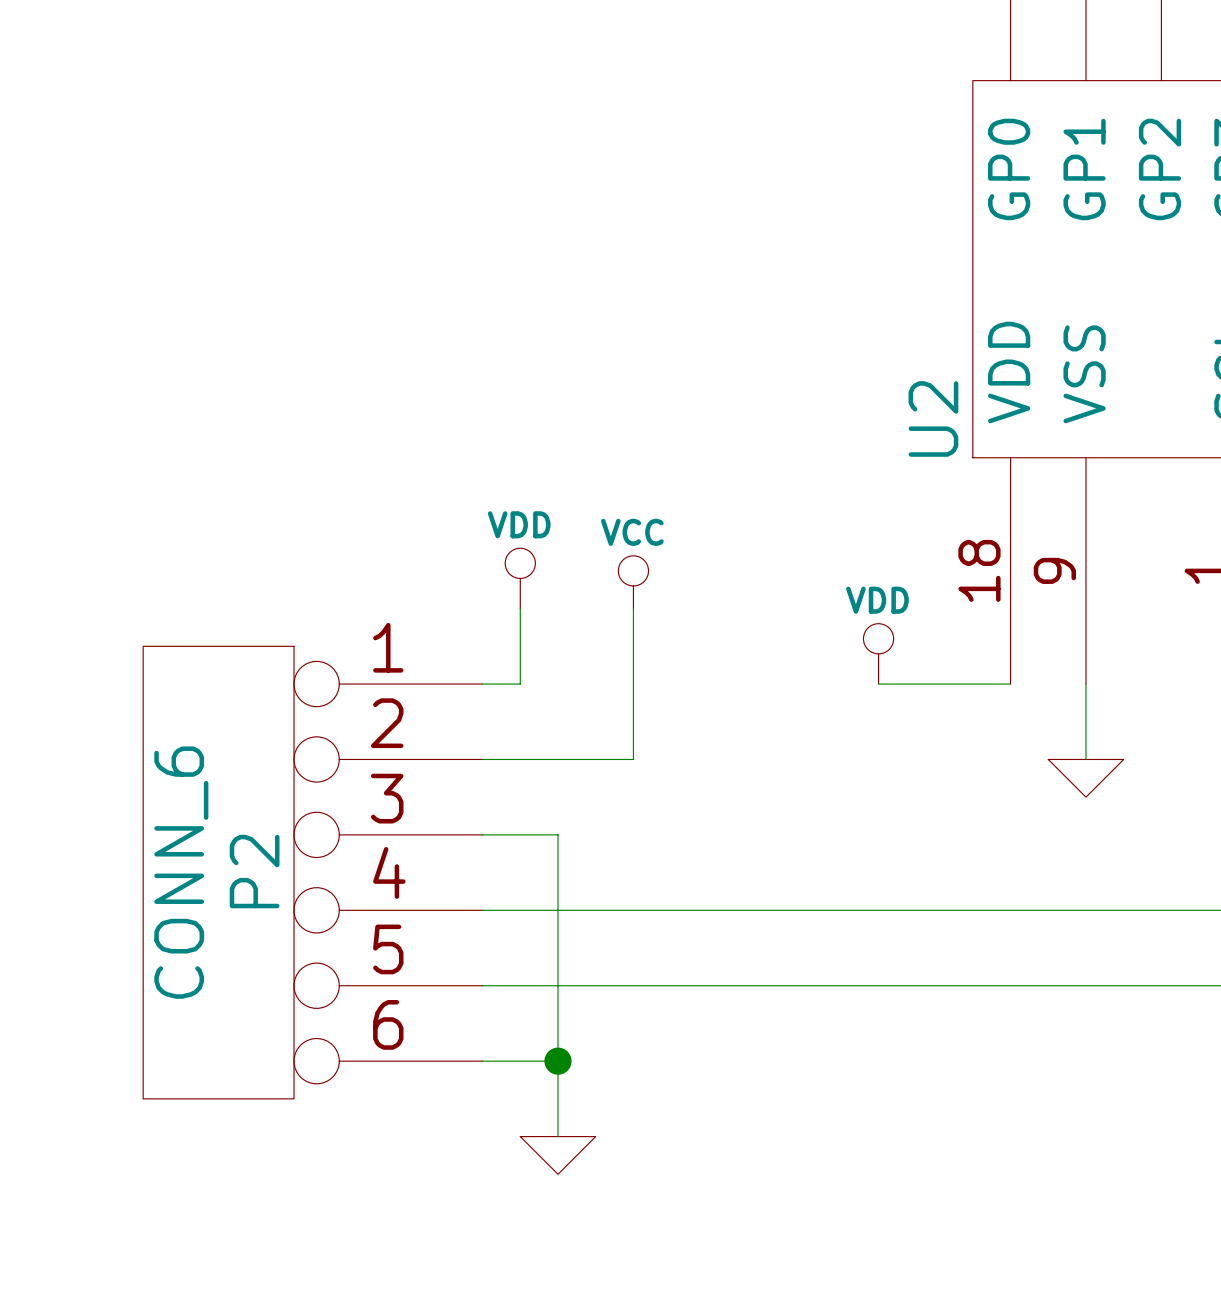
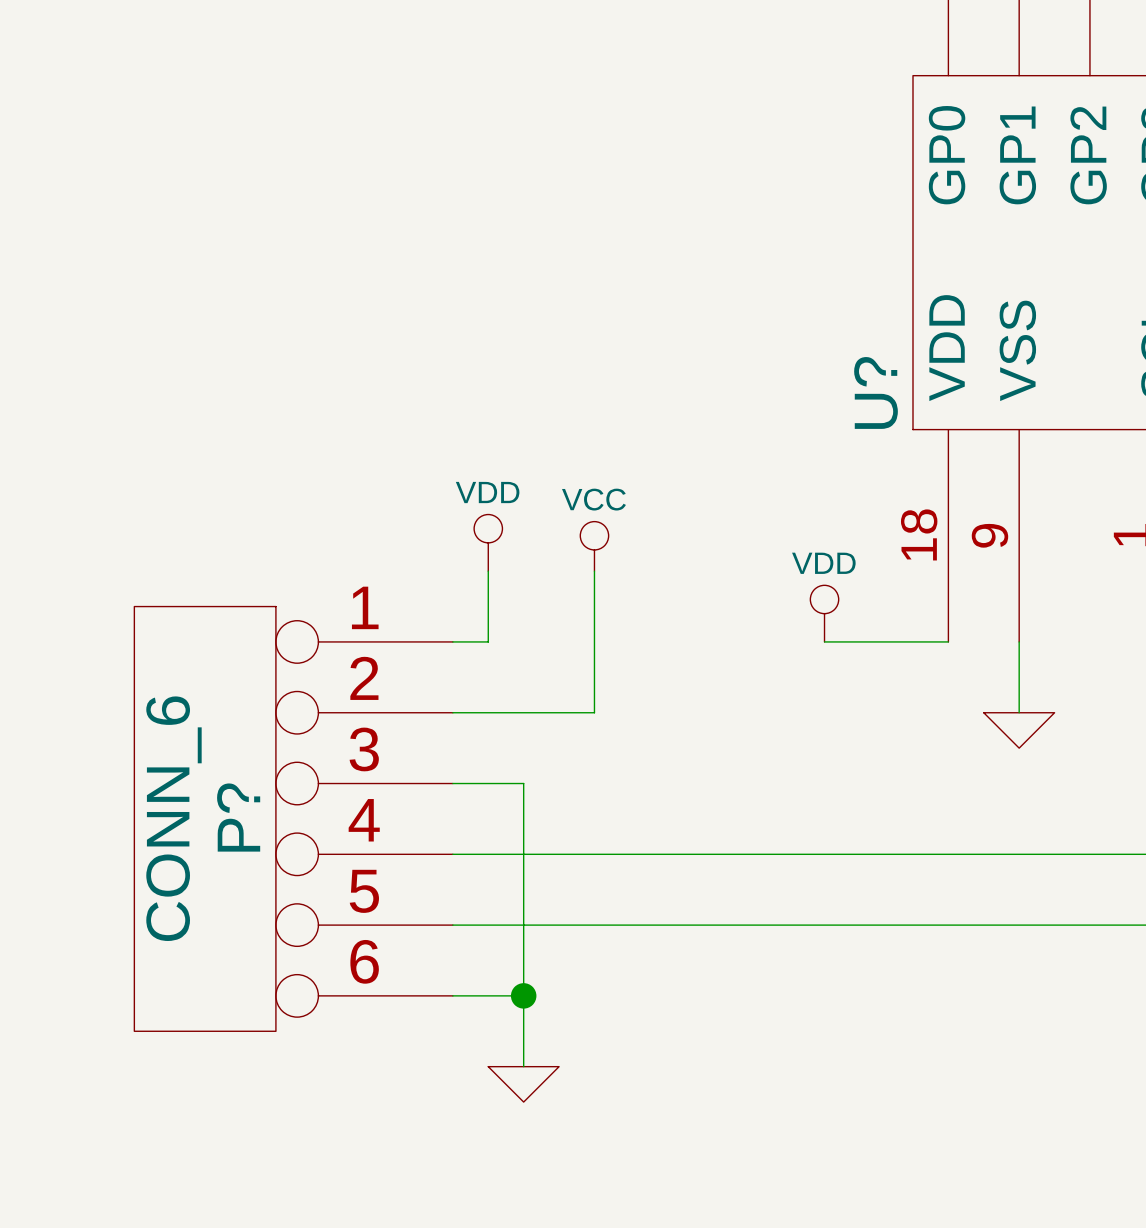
U2 name: U2 (933, 418) -> U? (876, 392)
P2 name: P2 (254, 871) -> P? (238, 817)

